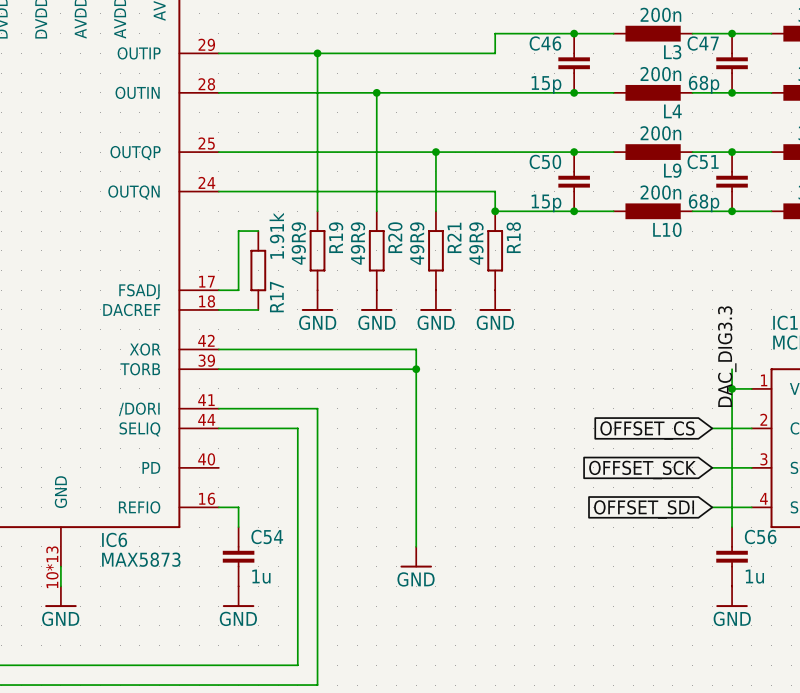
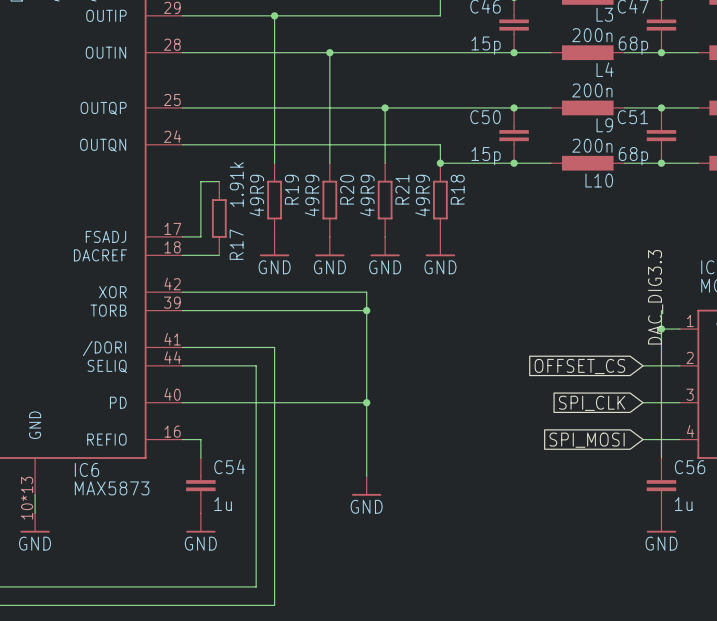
wire: none -> (182, 402) (366, 402)
junction: none -> (366, 402)
global label: OFFSET_SCK (642, 470) -> SPI_CLK (592, 403)
global label: OFFSET_SDI (644, 509) -> SPI_MOSI (587, 440)

